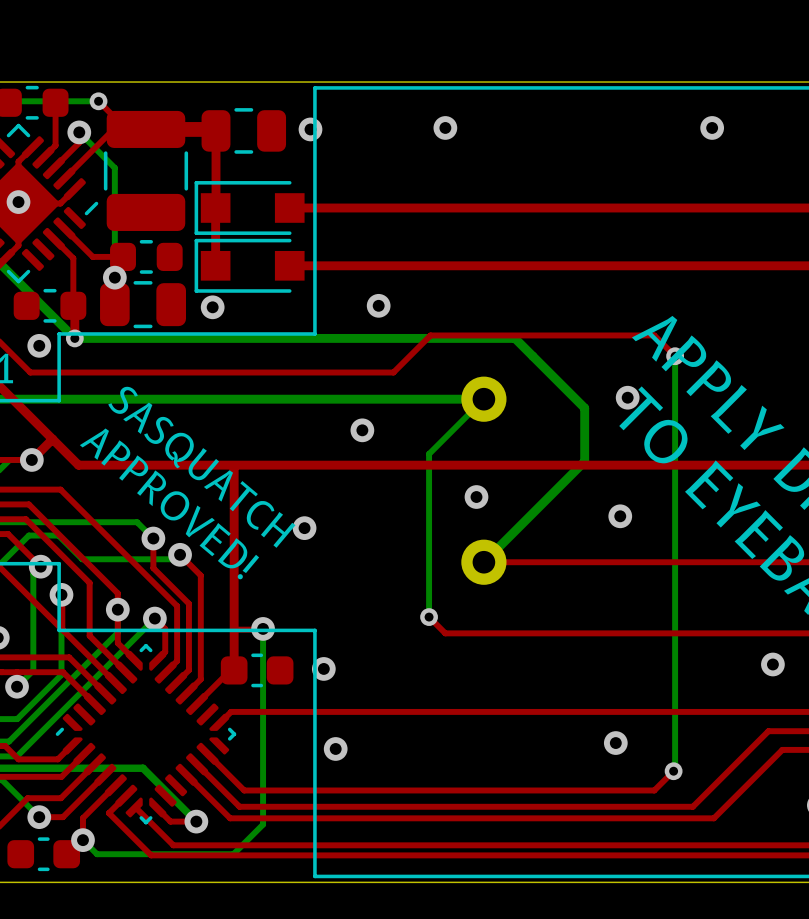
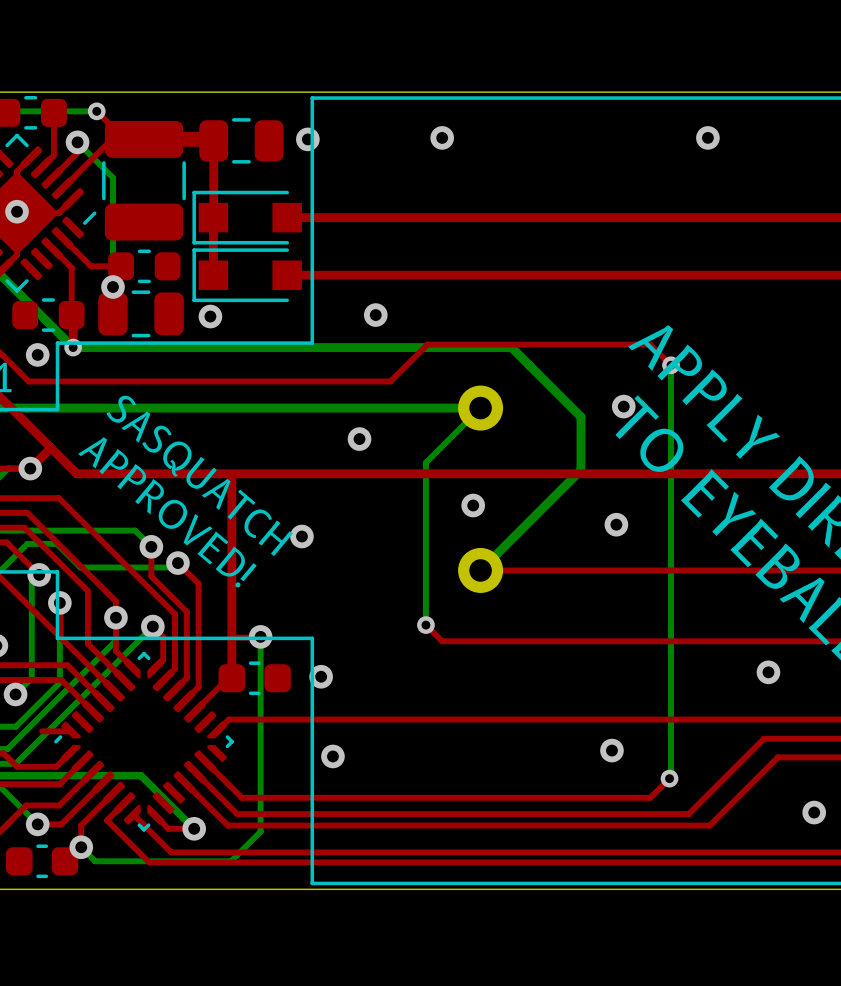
top track: none -> (42, 731) (70, 731)

